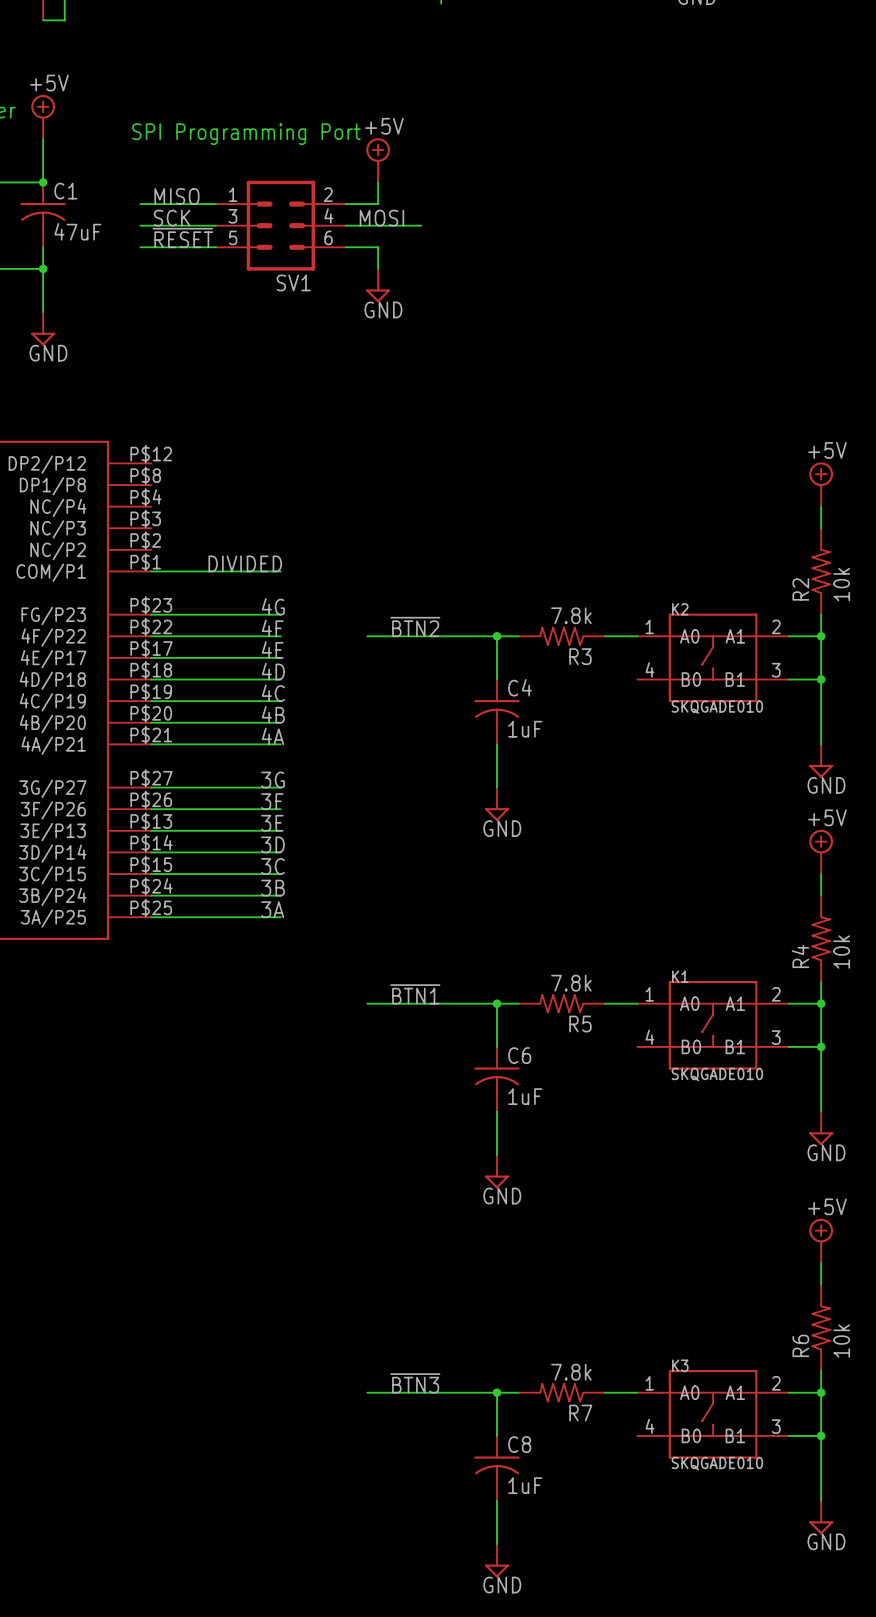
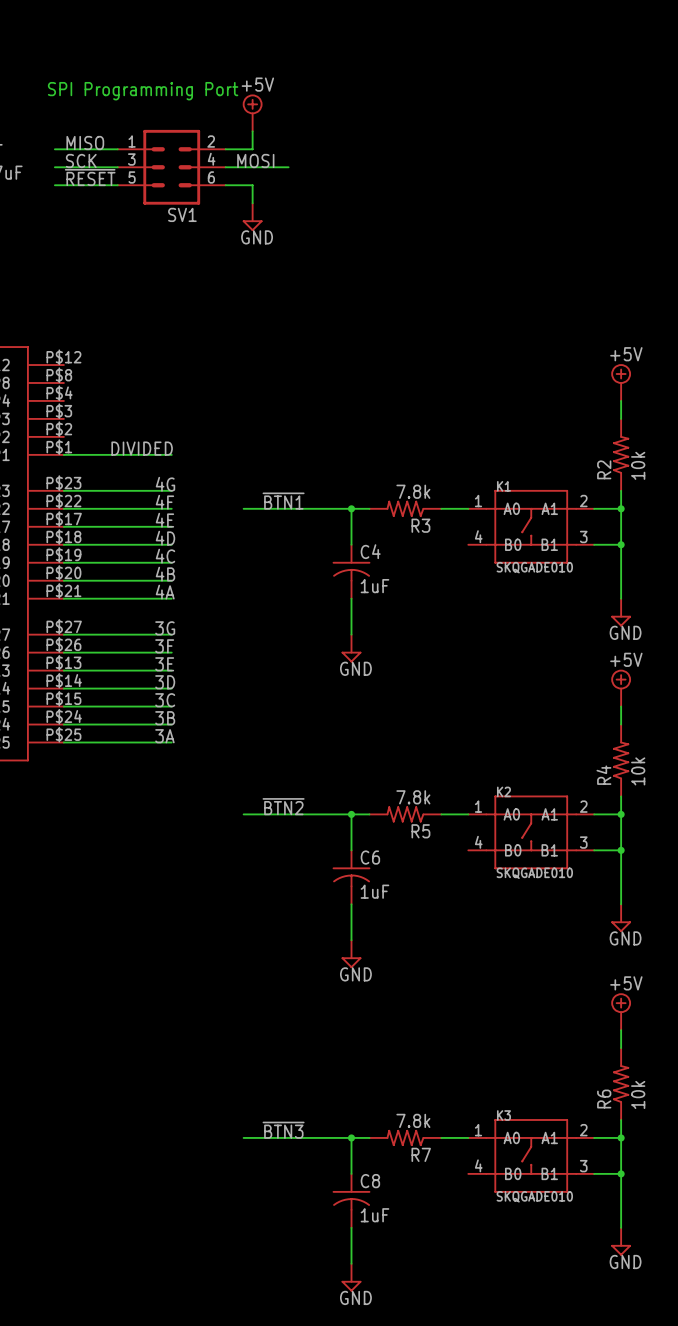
K2 name: K2 (680, 609) -> K1 (503, 486)
label: ~{BTN2} (415, 626) -> ~{BTN1} (283, 501)
K1 name: K1 (680, 976) -> K2 (503, 791)
label: ~{BTN1} (415, 994) -> ~{BTN2} (283, 806)

